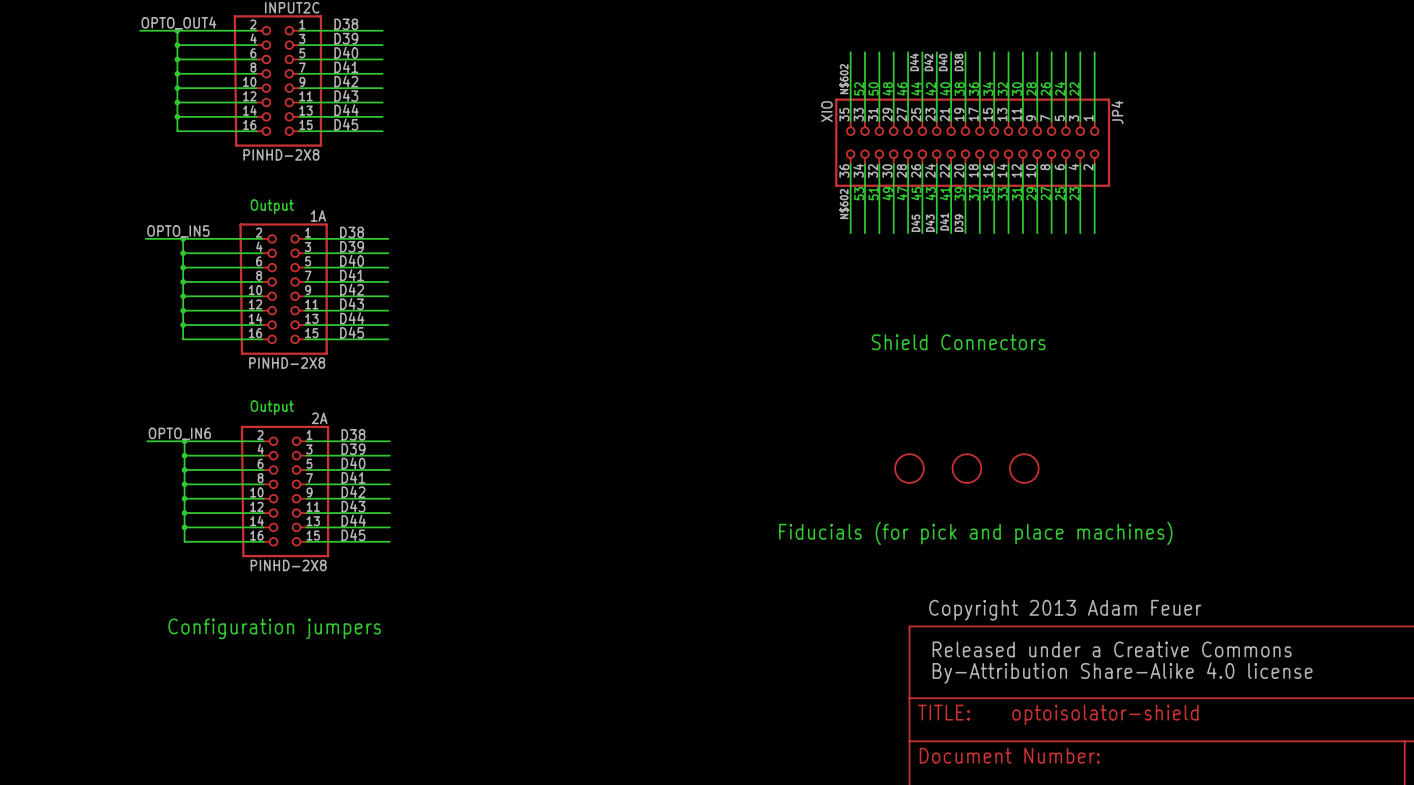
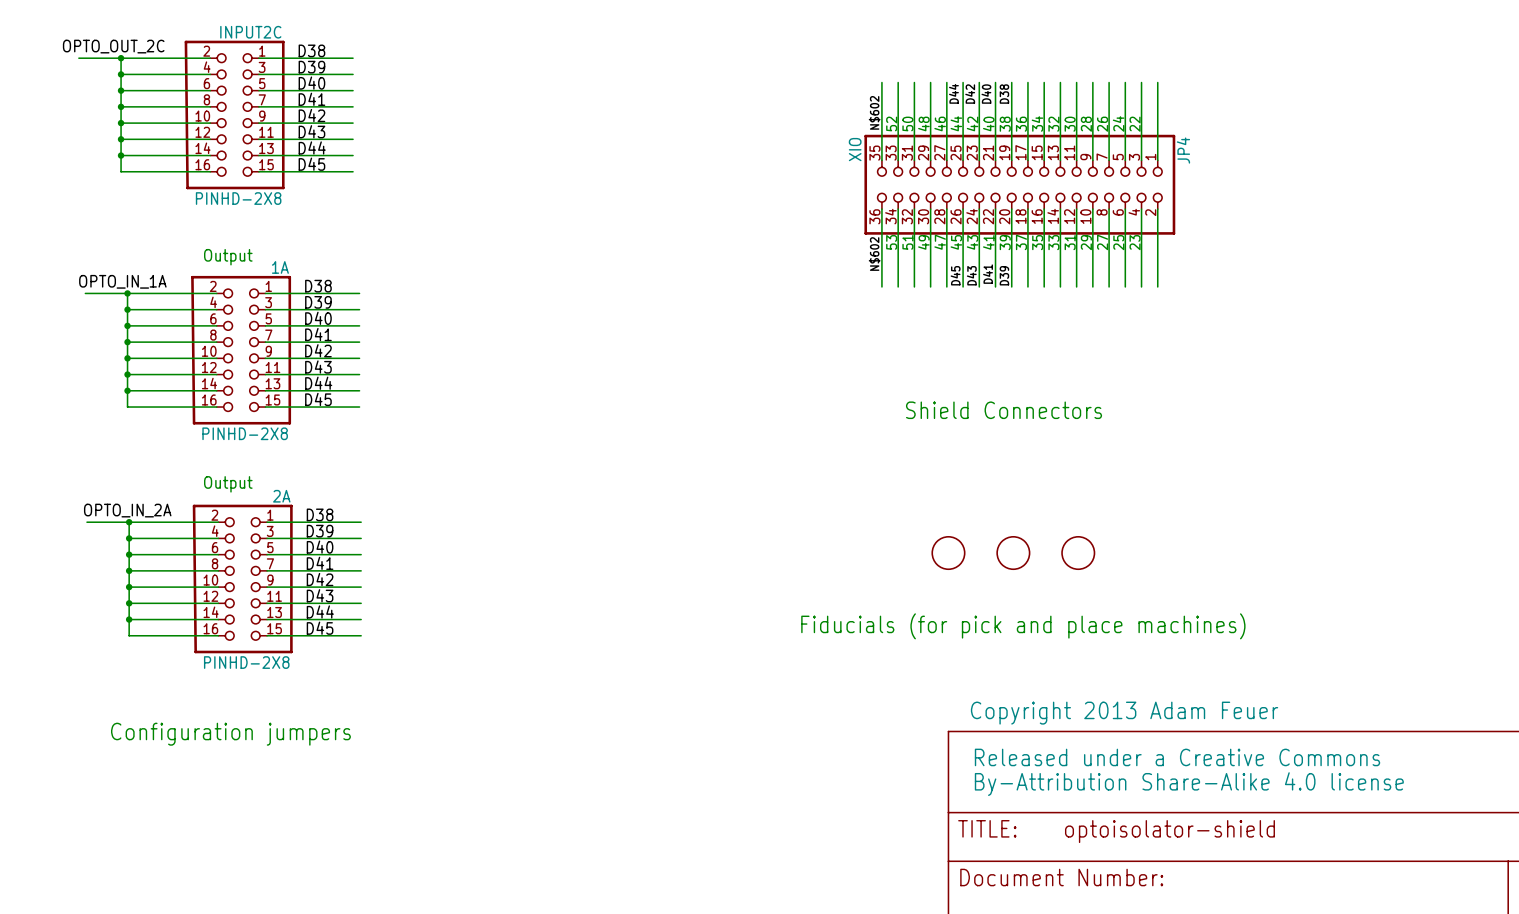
label: OPTO_OUT4 (178, 23) -> OPTO_OUT_2C (113, 46)
label: OPTO_IN5 (178, 231) -> OPTO_IN_1A (122, 281)
label: OPTO_IN6 (179, 433) -> OPTO_IN_2A (127, 510)

